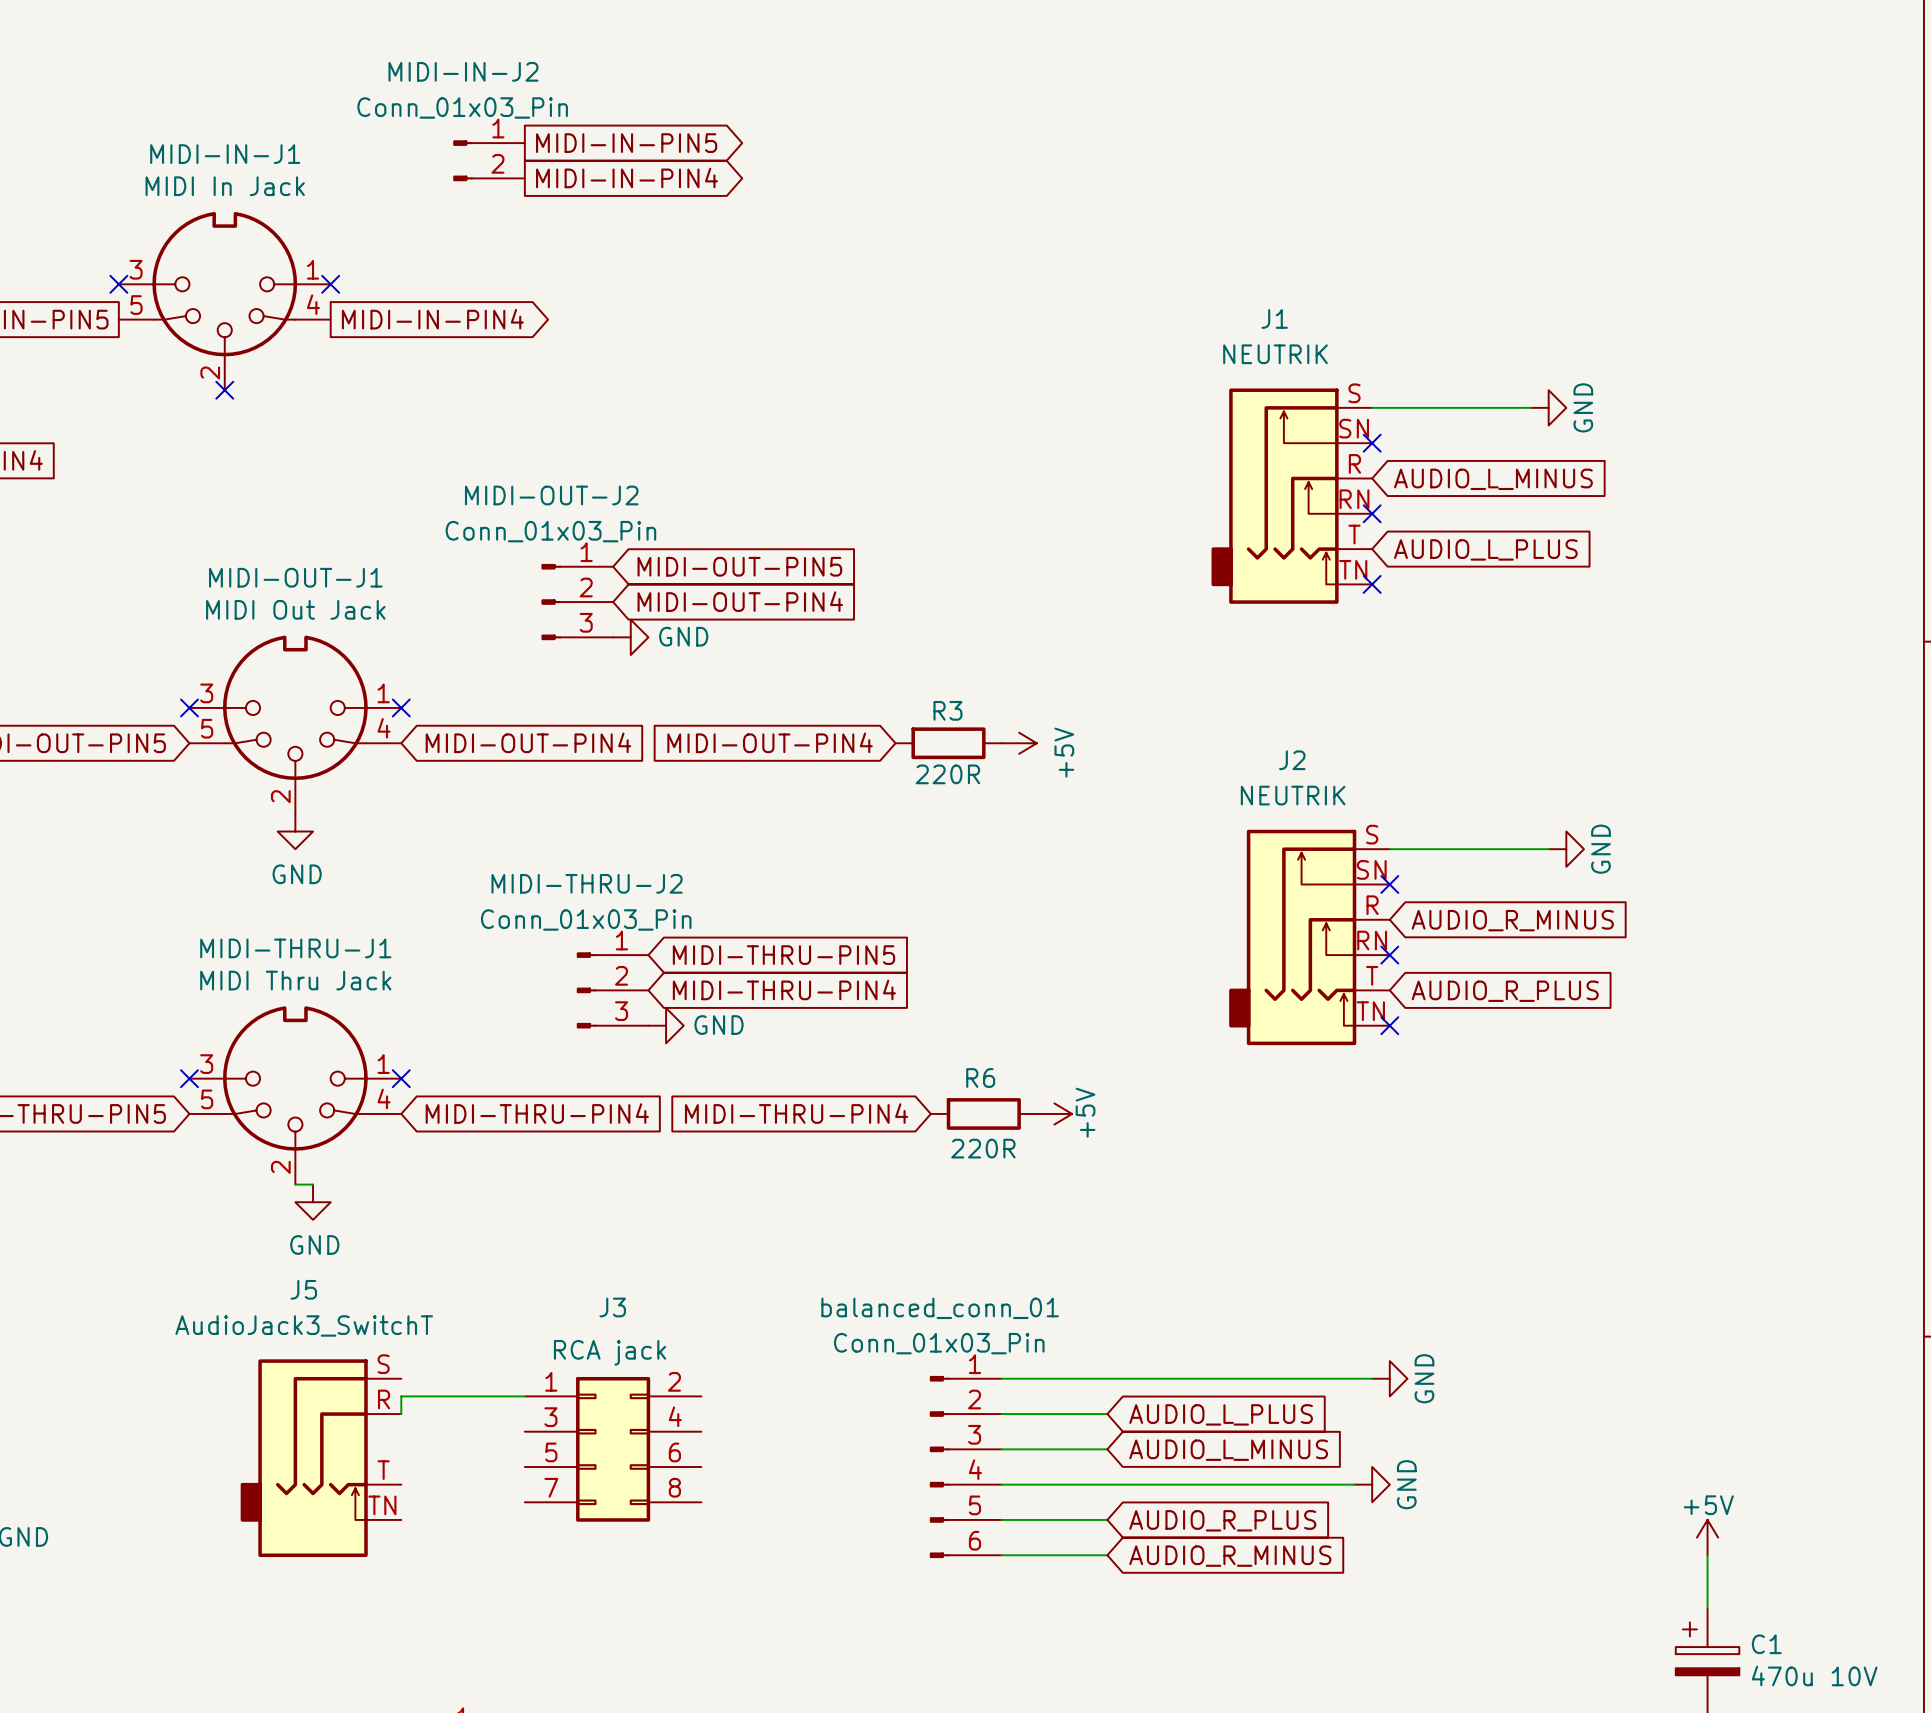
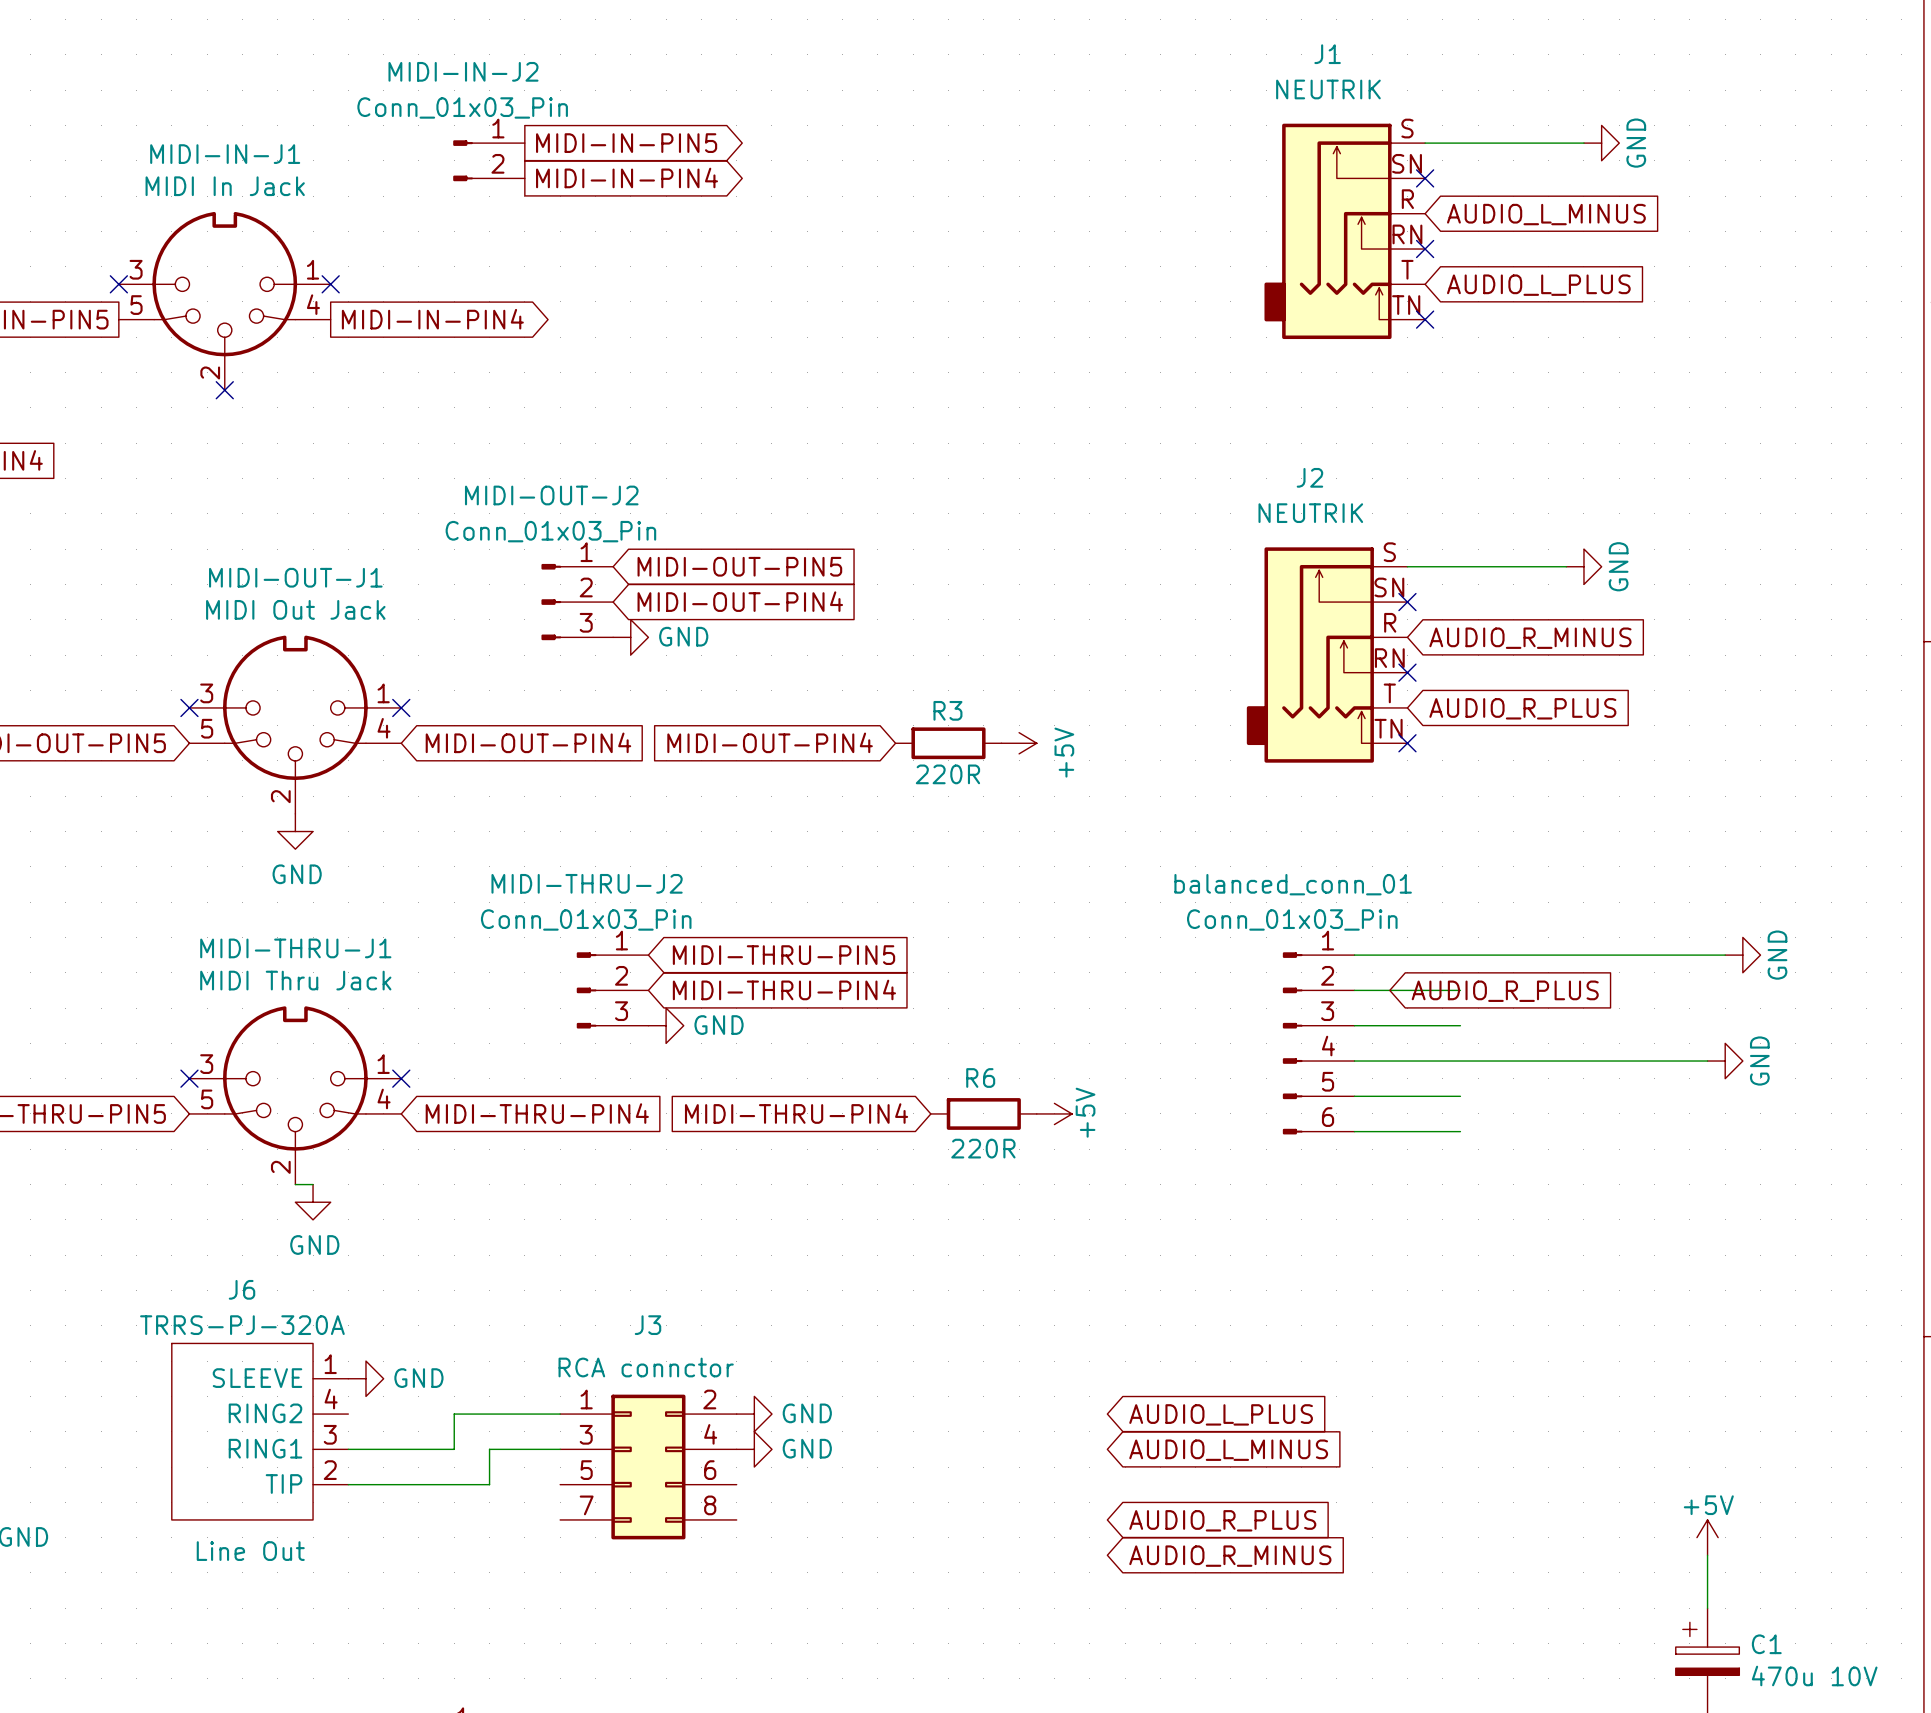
wire: none -> (1425, 143) (1583, 143)
power symbol: none -> GND (1601, 143)
no-connect mark: none -> (1425, 178)
no-connect mark: none -> (1425, 249)
no-connect mark: none -> (1425, 319)
wire: (1372, 407) (1531, 407) -> (1407, 566) (1566, 566)
power symbol: GND (1548, 407) -> none
no-connect mark: (1372, 443) -> none
global label position: AUDIO_L_MINUS (1493, 479) -> AUDIO_L_MINUS (1546, 214)
J1 position: (1291, 496) -> (1344, 231)
no-connect mark: (1372, 513) -> none
global label position: AUDIO_L_PLUS (1485, 549) -> AUDIO_L_PLUS (1538, 285)
power symbol: none -> GND (1583, 566)
no-connect mark position: (1372, 584) -> (1407, 602)
no-connect mark: none -> (1407, 672)
global label: none -> AUDIO_R_PLUS (1522, 708)
no-connect mark: none -> (1407, 743)
wire: (1389, 849) (1548, 849) -> none
power symbol: GND (1566, 849) -> none
no-connect mark: (1389, 884) -> none
global label position: AUDIO_R_MINUS (1512, 920) -> AUDIO_R_MINUS (1530, 638)
J2 position: (1309, 937) -> (1327, 655)
wire: none -> (1354, 955) (1725, 955)
no-connect mark: (1389, 955) -> none
power symbol: none -> GND (1742, 955)
wire: none -> (1354, 990) (1460, 990)
wire: none -> (1354, 1025) (1460, 1025)
no-connect mark: (1389, 1025) -> none
wire: none -> (1354, 1061) (1707, 1061)
power symbol: none -> GND (1725, 1061)
wire: none -> (1354, 1096) (1460, 1096)
wire: none -> (1354, 1131) (1460, 1131)
J3 text: RCA jack (610, 1352) -> RCA connctor (646, 1367)
power symbol: none -> GND (365, 1378)
wire: (1001, 1378) (1372, 1378) -> none
power symbol: GND (1389, 1378) -> none
wire: (524, 1396) (401, 1396) (401, 1414) -> none
wire: none -> (560, 1414) (454, 1414) (454, 1449) (348, 1449)
power symbol: none -> GND (754, 1414)
wire: (1001, 1414) (1107, 1414) -> none
J6: none -> TRRS-PJ-320A (260, 1431)
wire: none -> (560, 1449) (489, 1449) (489, 1484) (348, 1484)
J3 position: (613, 1449) -> (648, 1467)
power symbol: none -> GND (754, 1449)
wire: (1001, 1449) (1107, 1449) -> none
J5: AudioJack3_SwitchT (320, 1458) -> none
balanced_conn_01 position: (965, 1467) -> (1318, 1043)
wire: (1001, 1484) (1354, 1484) -> none
power symbol: GND (1372, 1484) -> none
wire: (1001, 1519) (1107, 1519) -> none
wire: (1001, 1555) (1107, 1555) -> none

